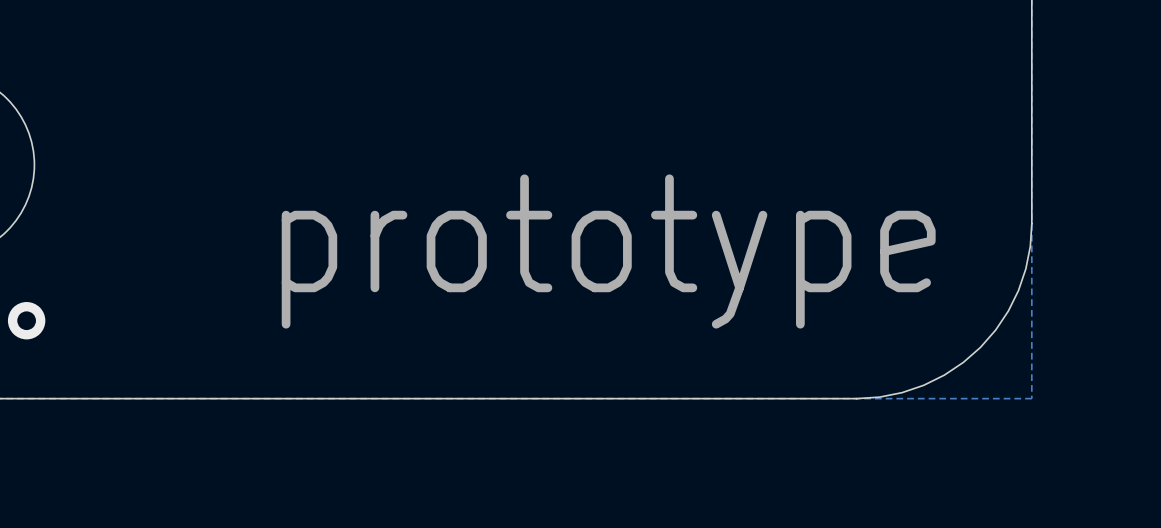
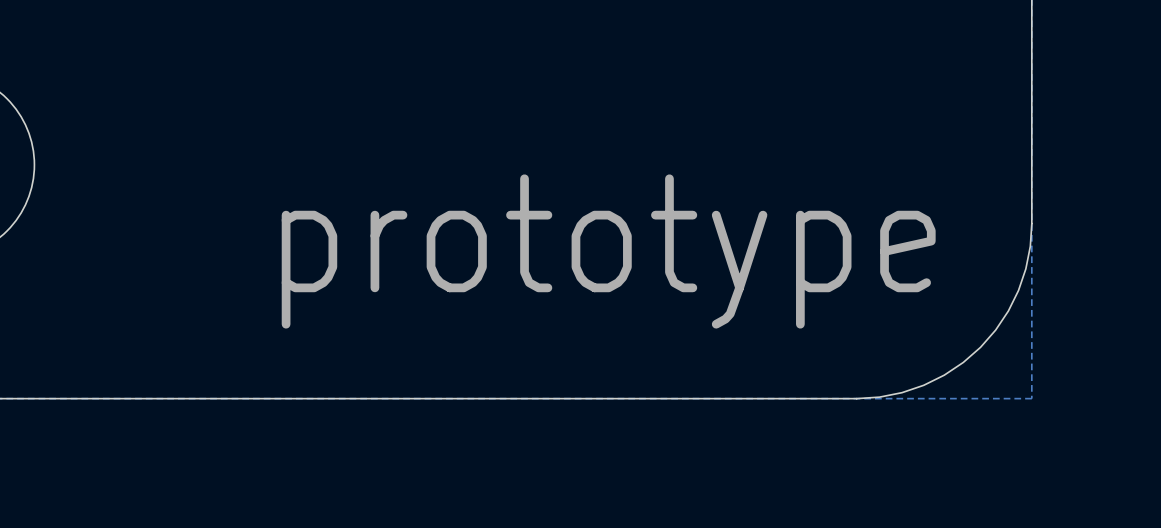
via: (26, 320) -> none

